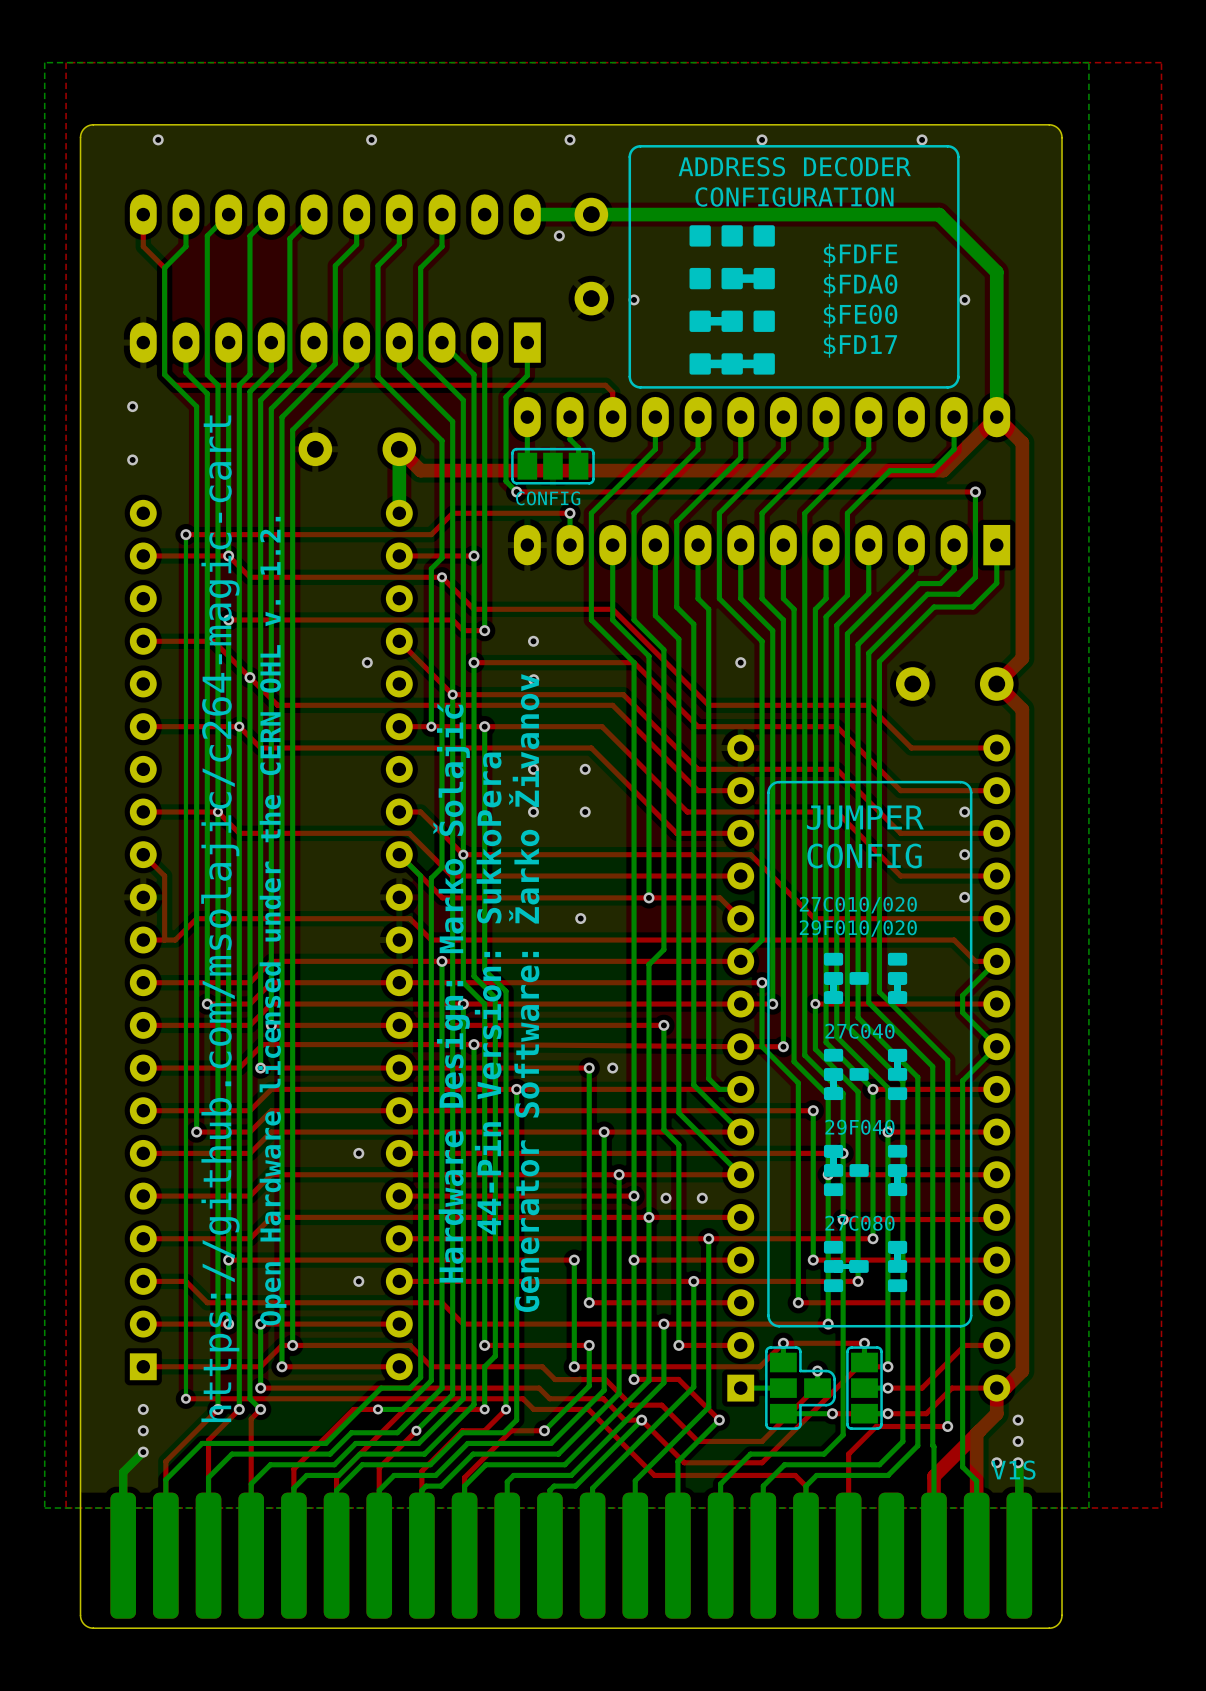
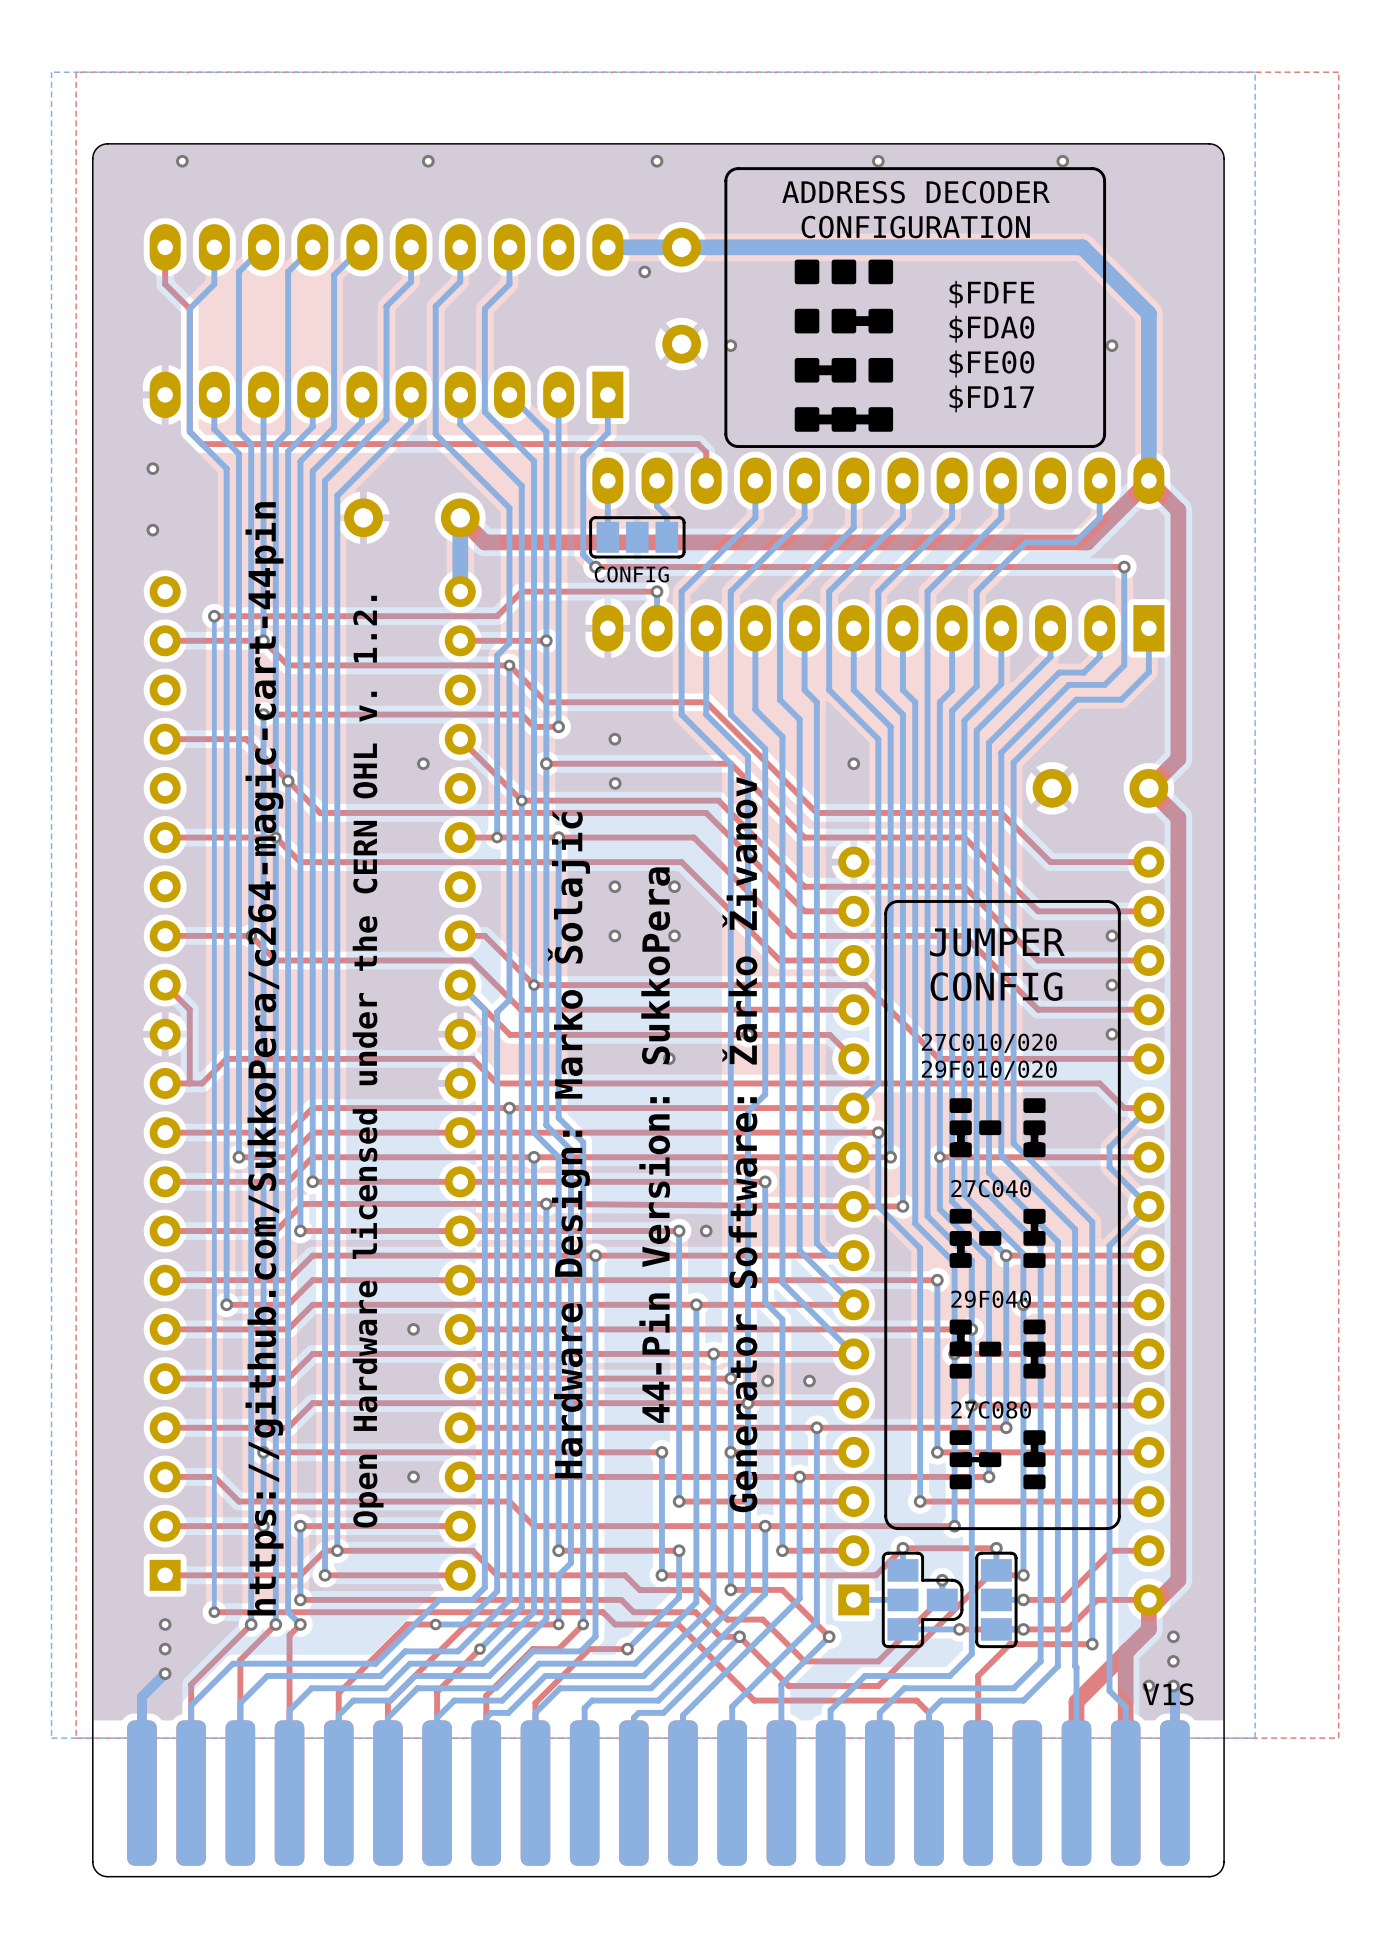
text: https://github.com/msolajic/c264-magic-cart (220, 918) -> https://github.com/SukkoPera/c264-magic-cart-44pin (264, 1058)
text position: Open Hardware licensed under the CERN OHL v. 1.2. (272, 921) -> Open Hardware licensed under the CERN OHL v. 1.2. (367, 1061)
text: Hardware Design: Marko Šolajić (451, 993) -> none
text: 44-Pin Version: SukkoPera (488, 993) -> Hardware Design: Marko Šolajić (568, 1144)
text position: Generator Software: Žarko Živanov (524, 993) -> Generator Software: Žarko Živanov (739, 1144)
text: none -> 44-Pin Version: SukkoPera (654, 1145)

